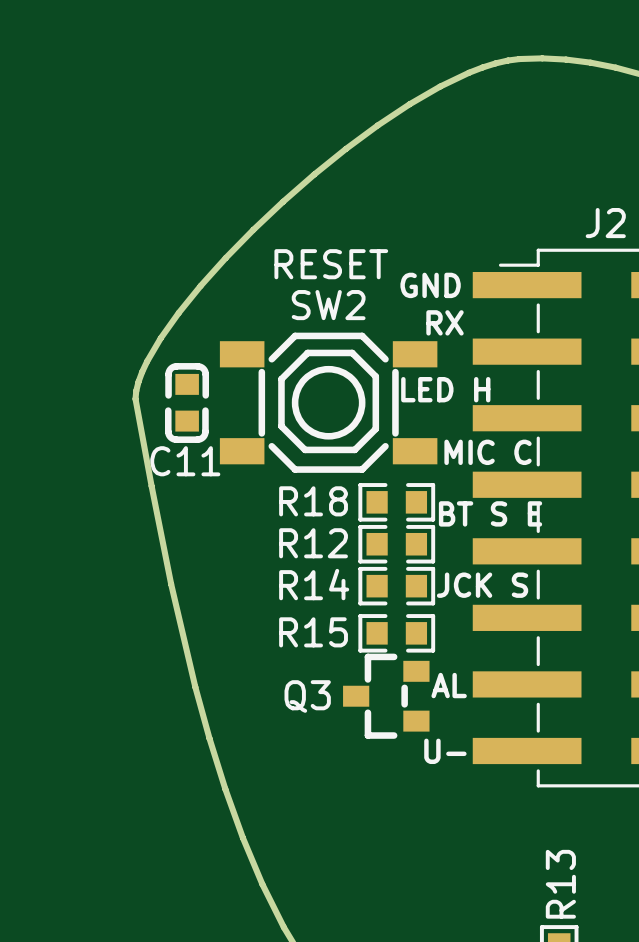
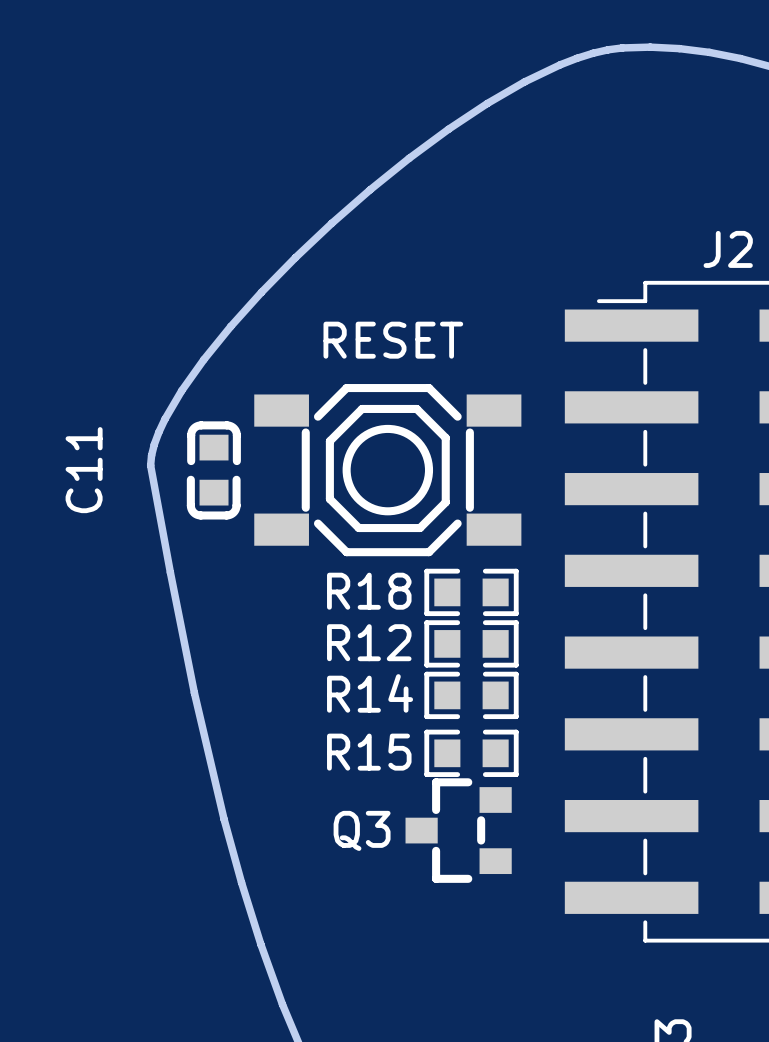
SW2 value position: RESET (331, 264) -> RESET (393, 340)
text: GND (430, 285) -> none
SW2 name: SW2 (328, 305) -> none
text: RX (445, 322) -> none
text: LED H (445, 389) -> none
text: MIC C (488, 452) -> none
C11 name rotation: 0° (185, 461) -> 90° counterclockwise (84, 470)
C11 name position: C11 (185, 461) -> C11 (84, 470)
text: BT S E (490, 513) -> none
text: JCK S (482, 585) -> none
text: AL (449, 685) -> none
text: U- (445, 751) -> none

